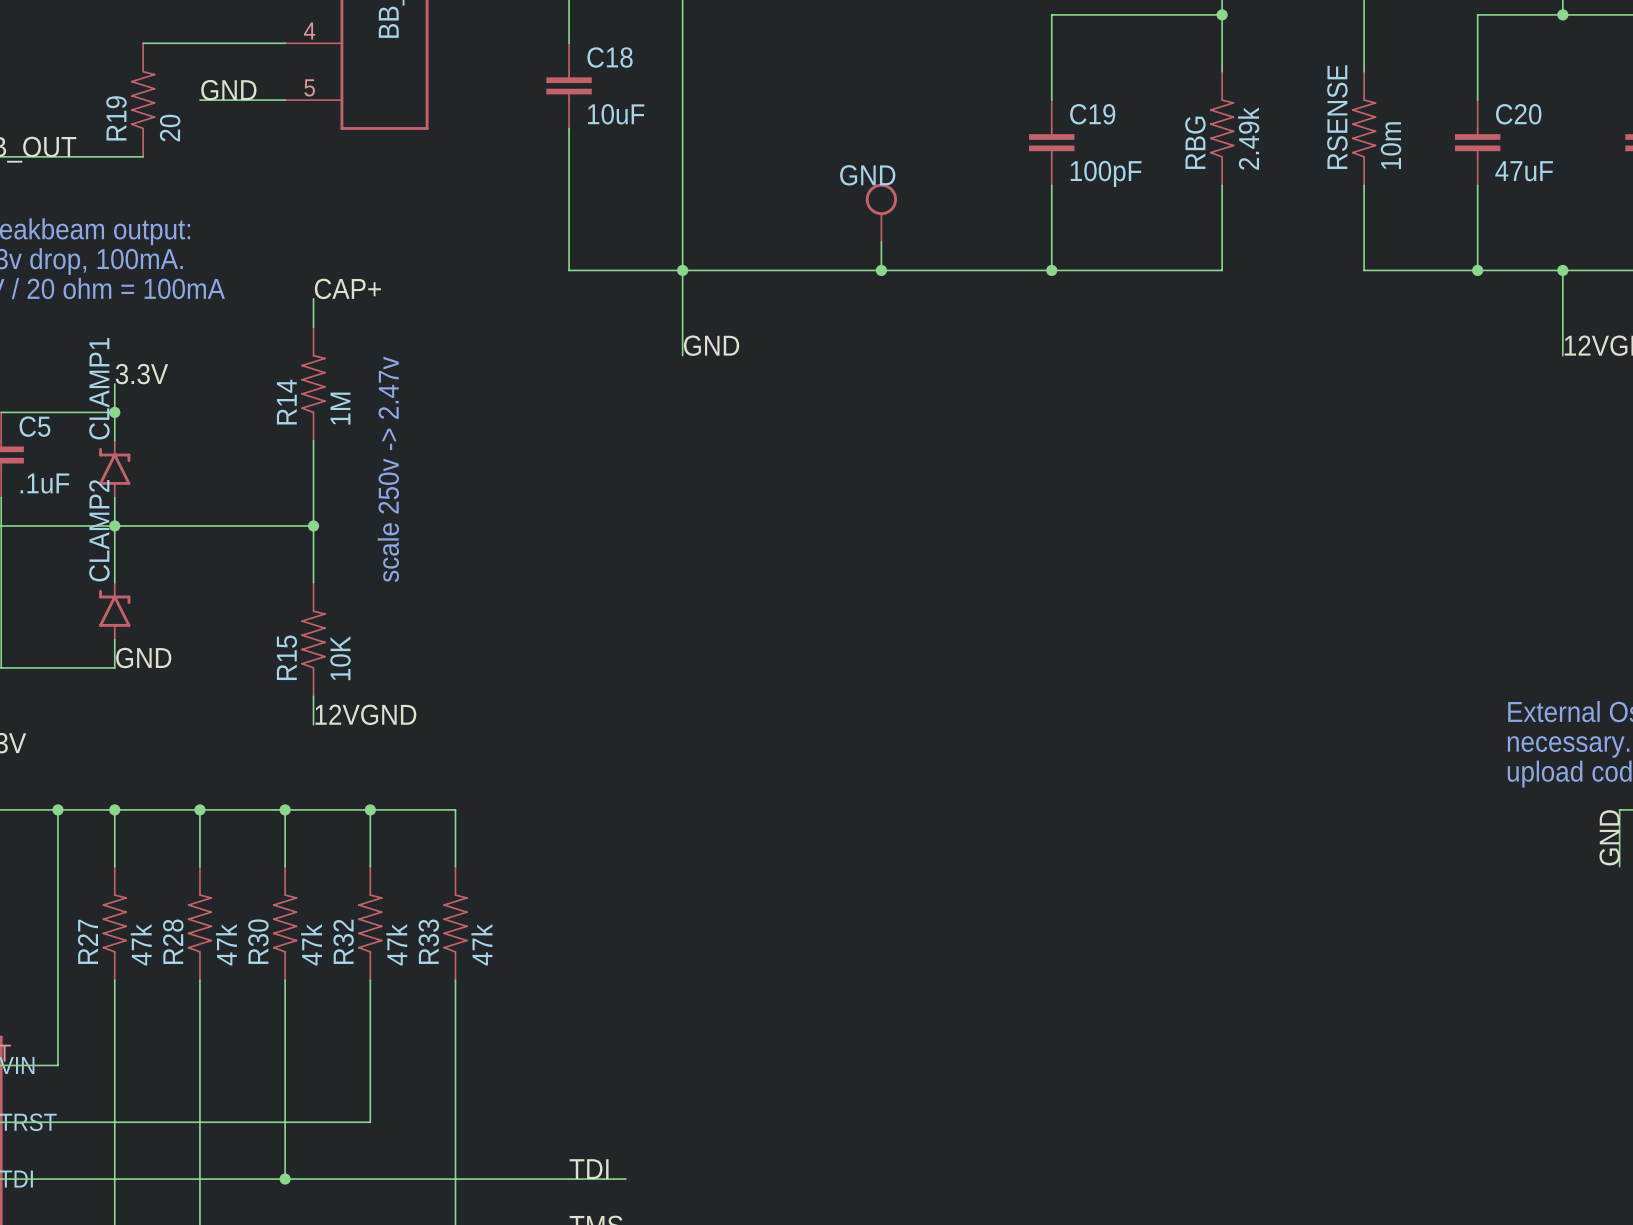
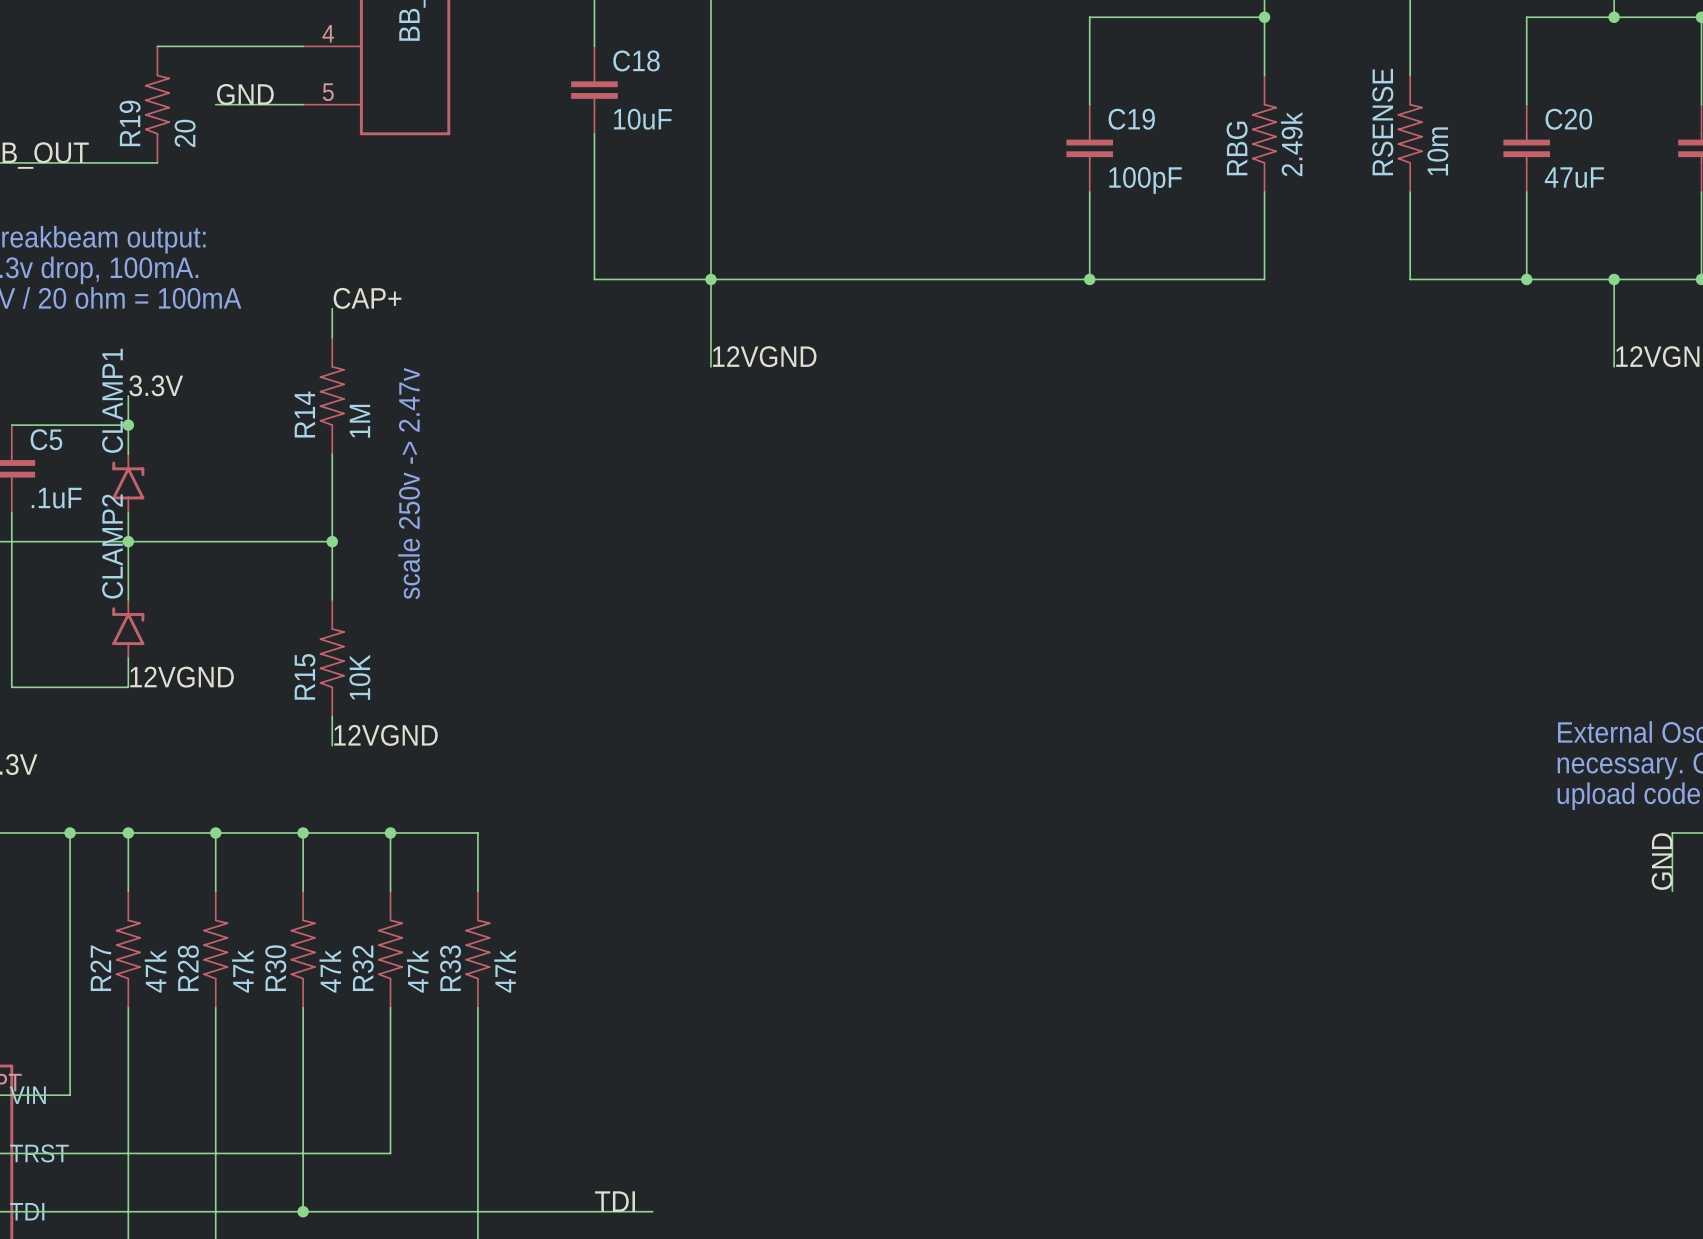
GND: (881, 212) -> none
wire: (881, 242) (881, 270) -> none
junction: (881, 270) -> none
label: GND (711, 345) -> 12VGND (764, 356)
label: GND (143, 658) -> 12VGND (182, 677)

